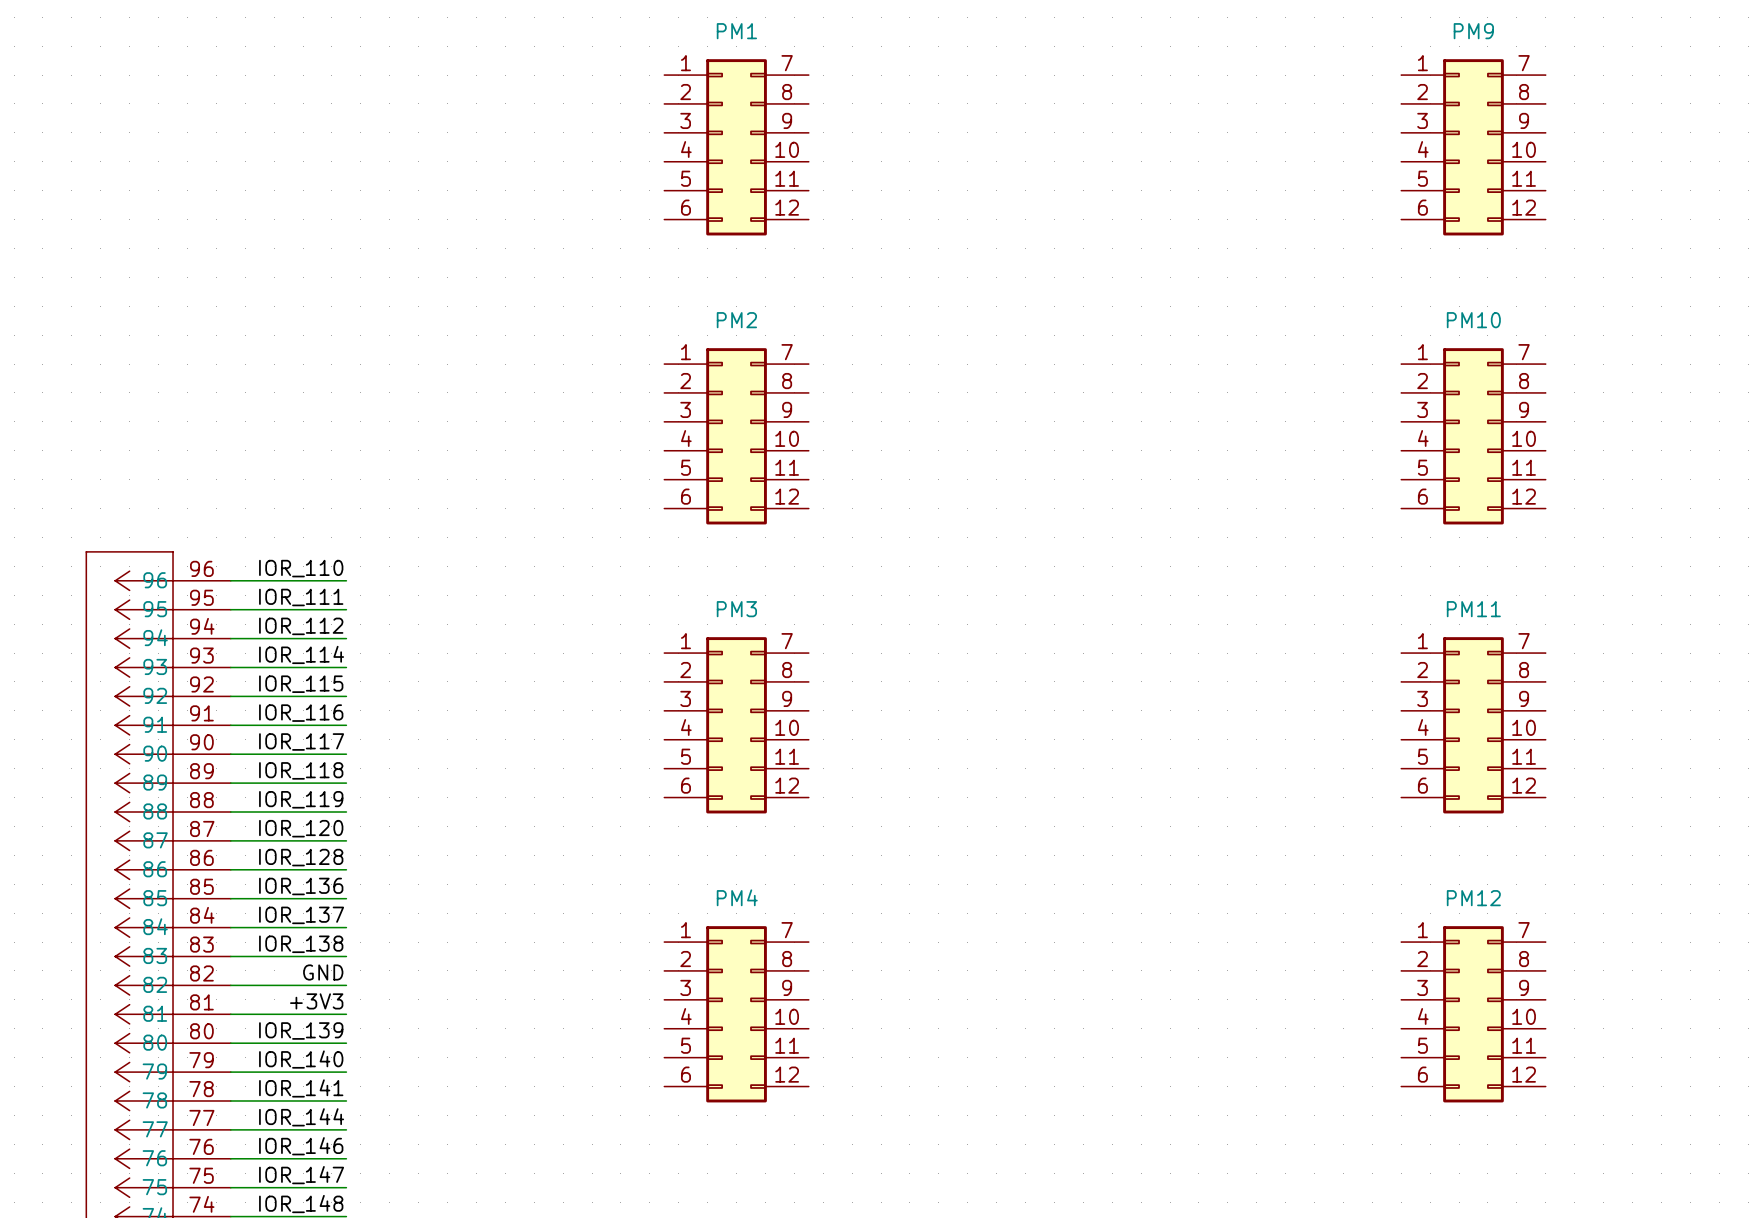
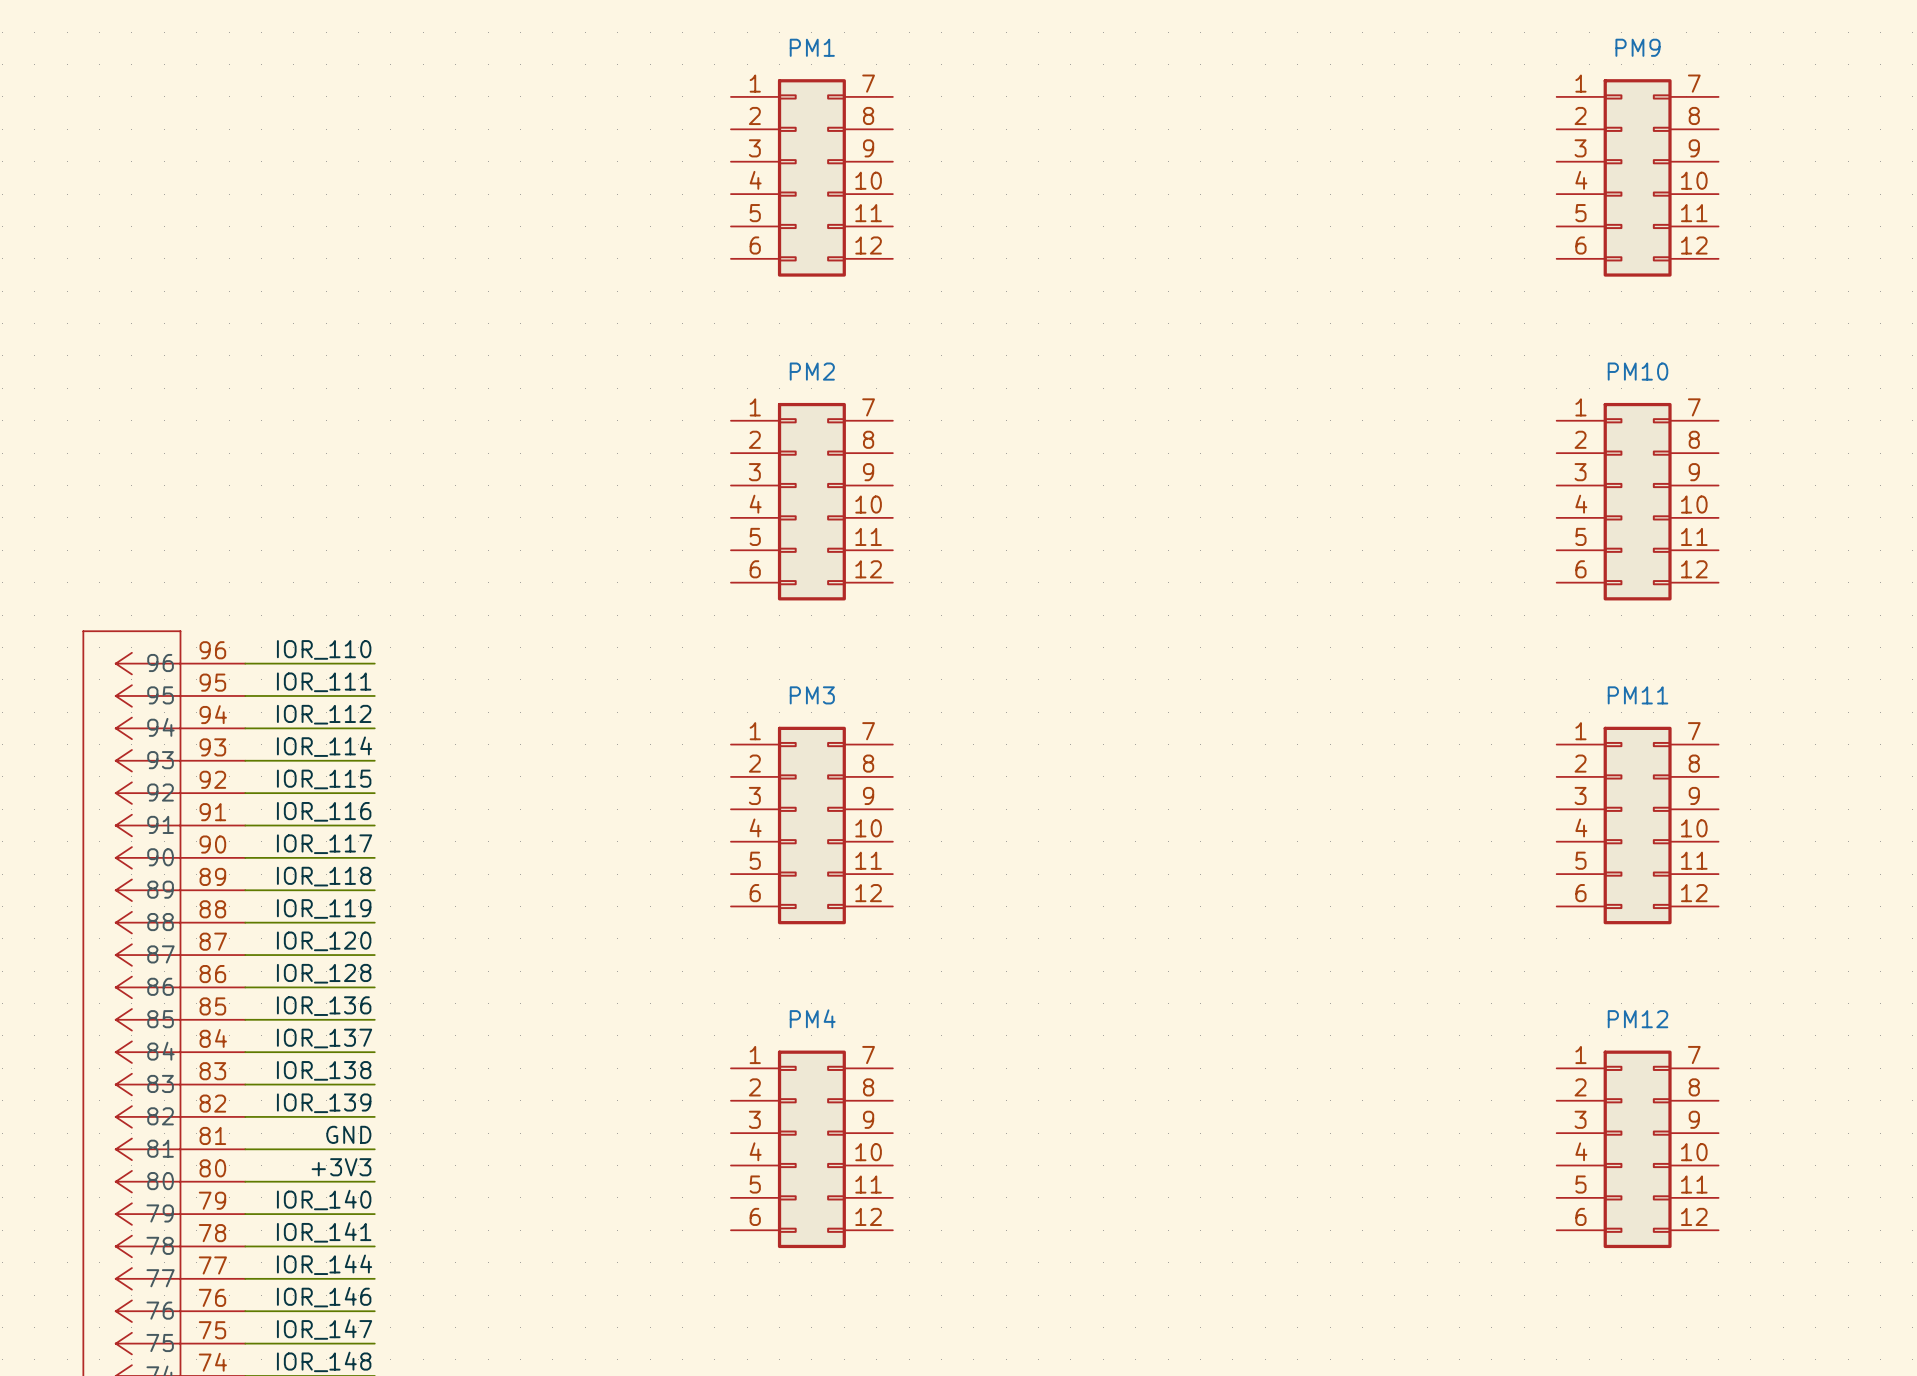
label: GND (323, 972) -> IOR_139 (324, 1103)
label: +3V3 (316, 1001) -> GND (348, 1134)
label: IOR_139 (301, 1030) -> +3V3 (341, 1167)

